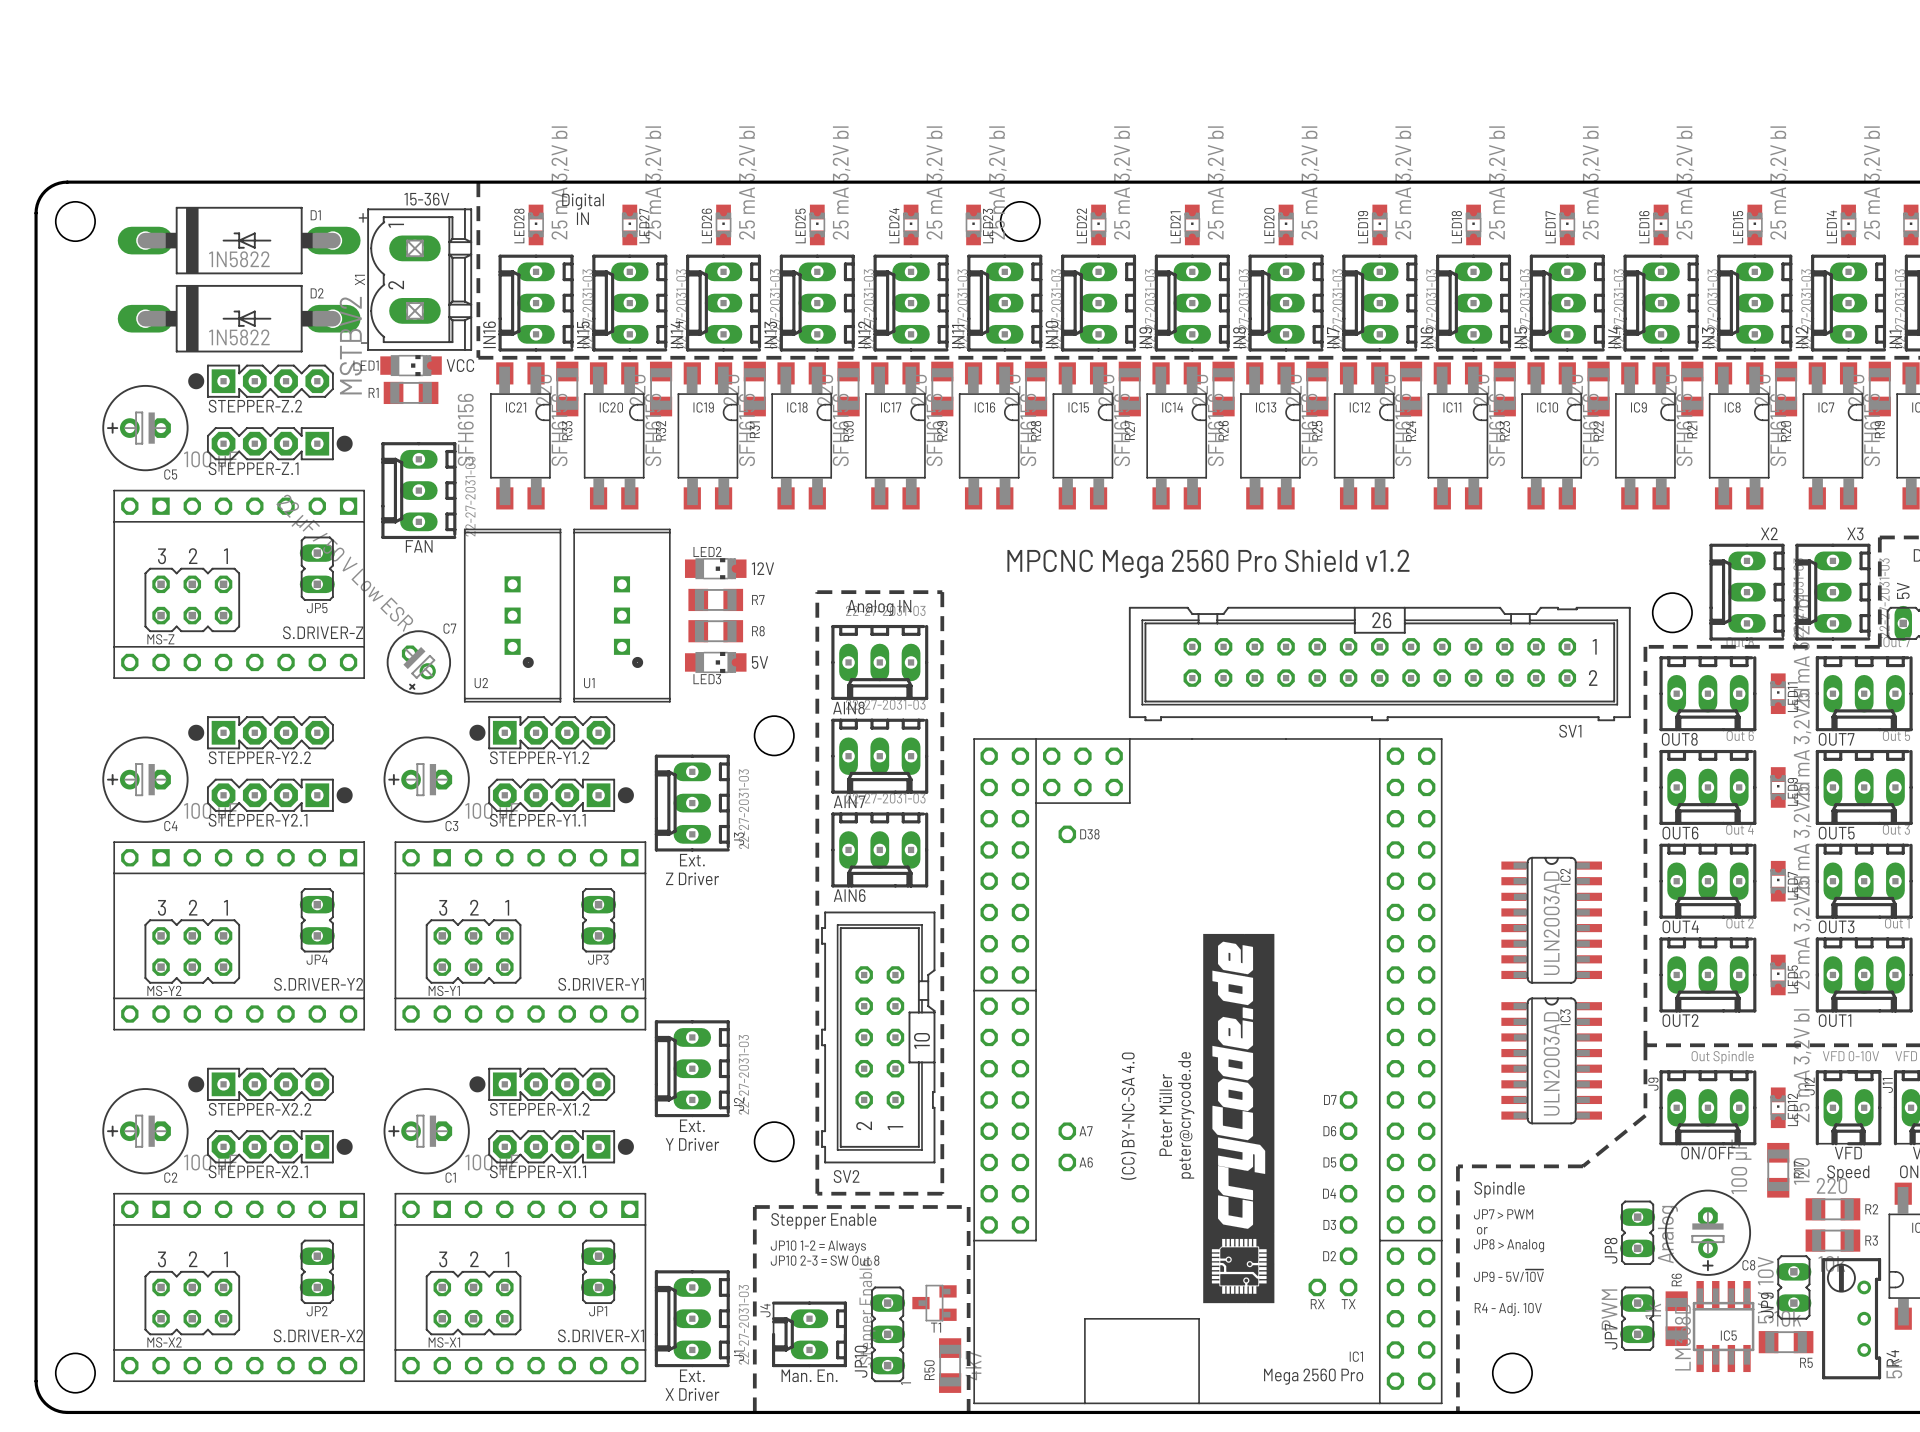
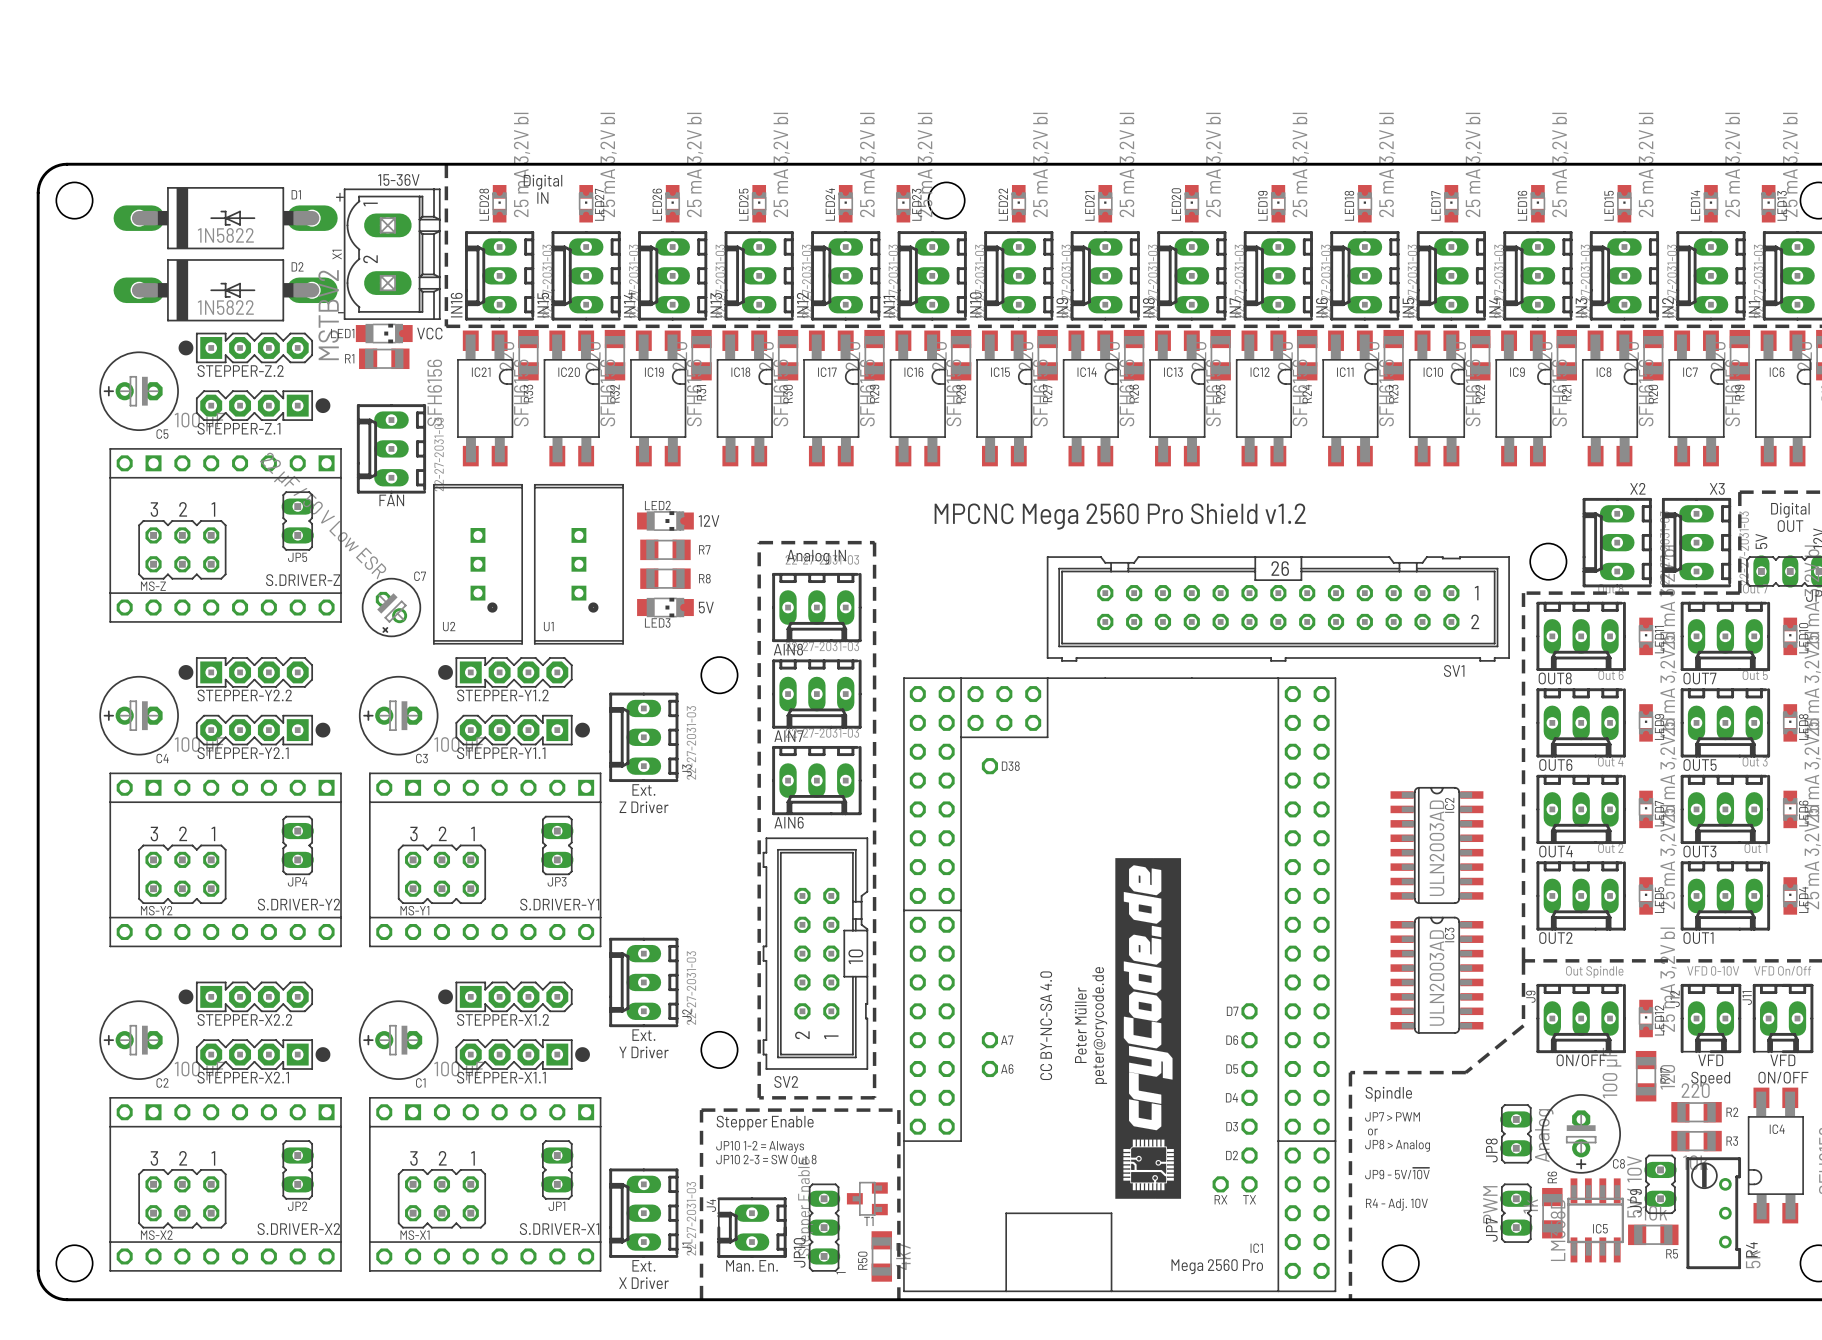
text: (CC) BY-NC-SA 4.0 (1128, 1116) -> CC BY-NC-SA 4.0 (1046, 1025)

